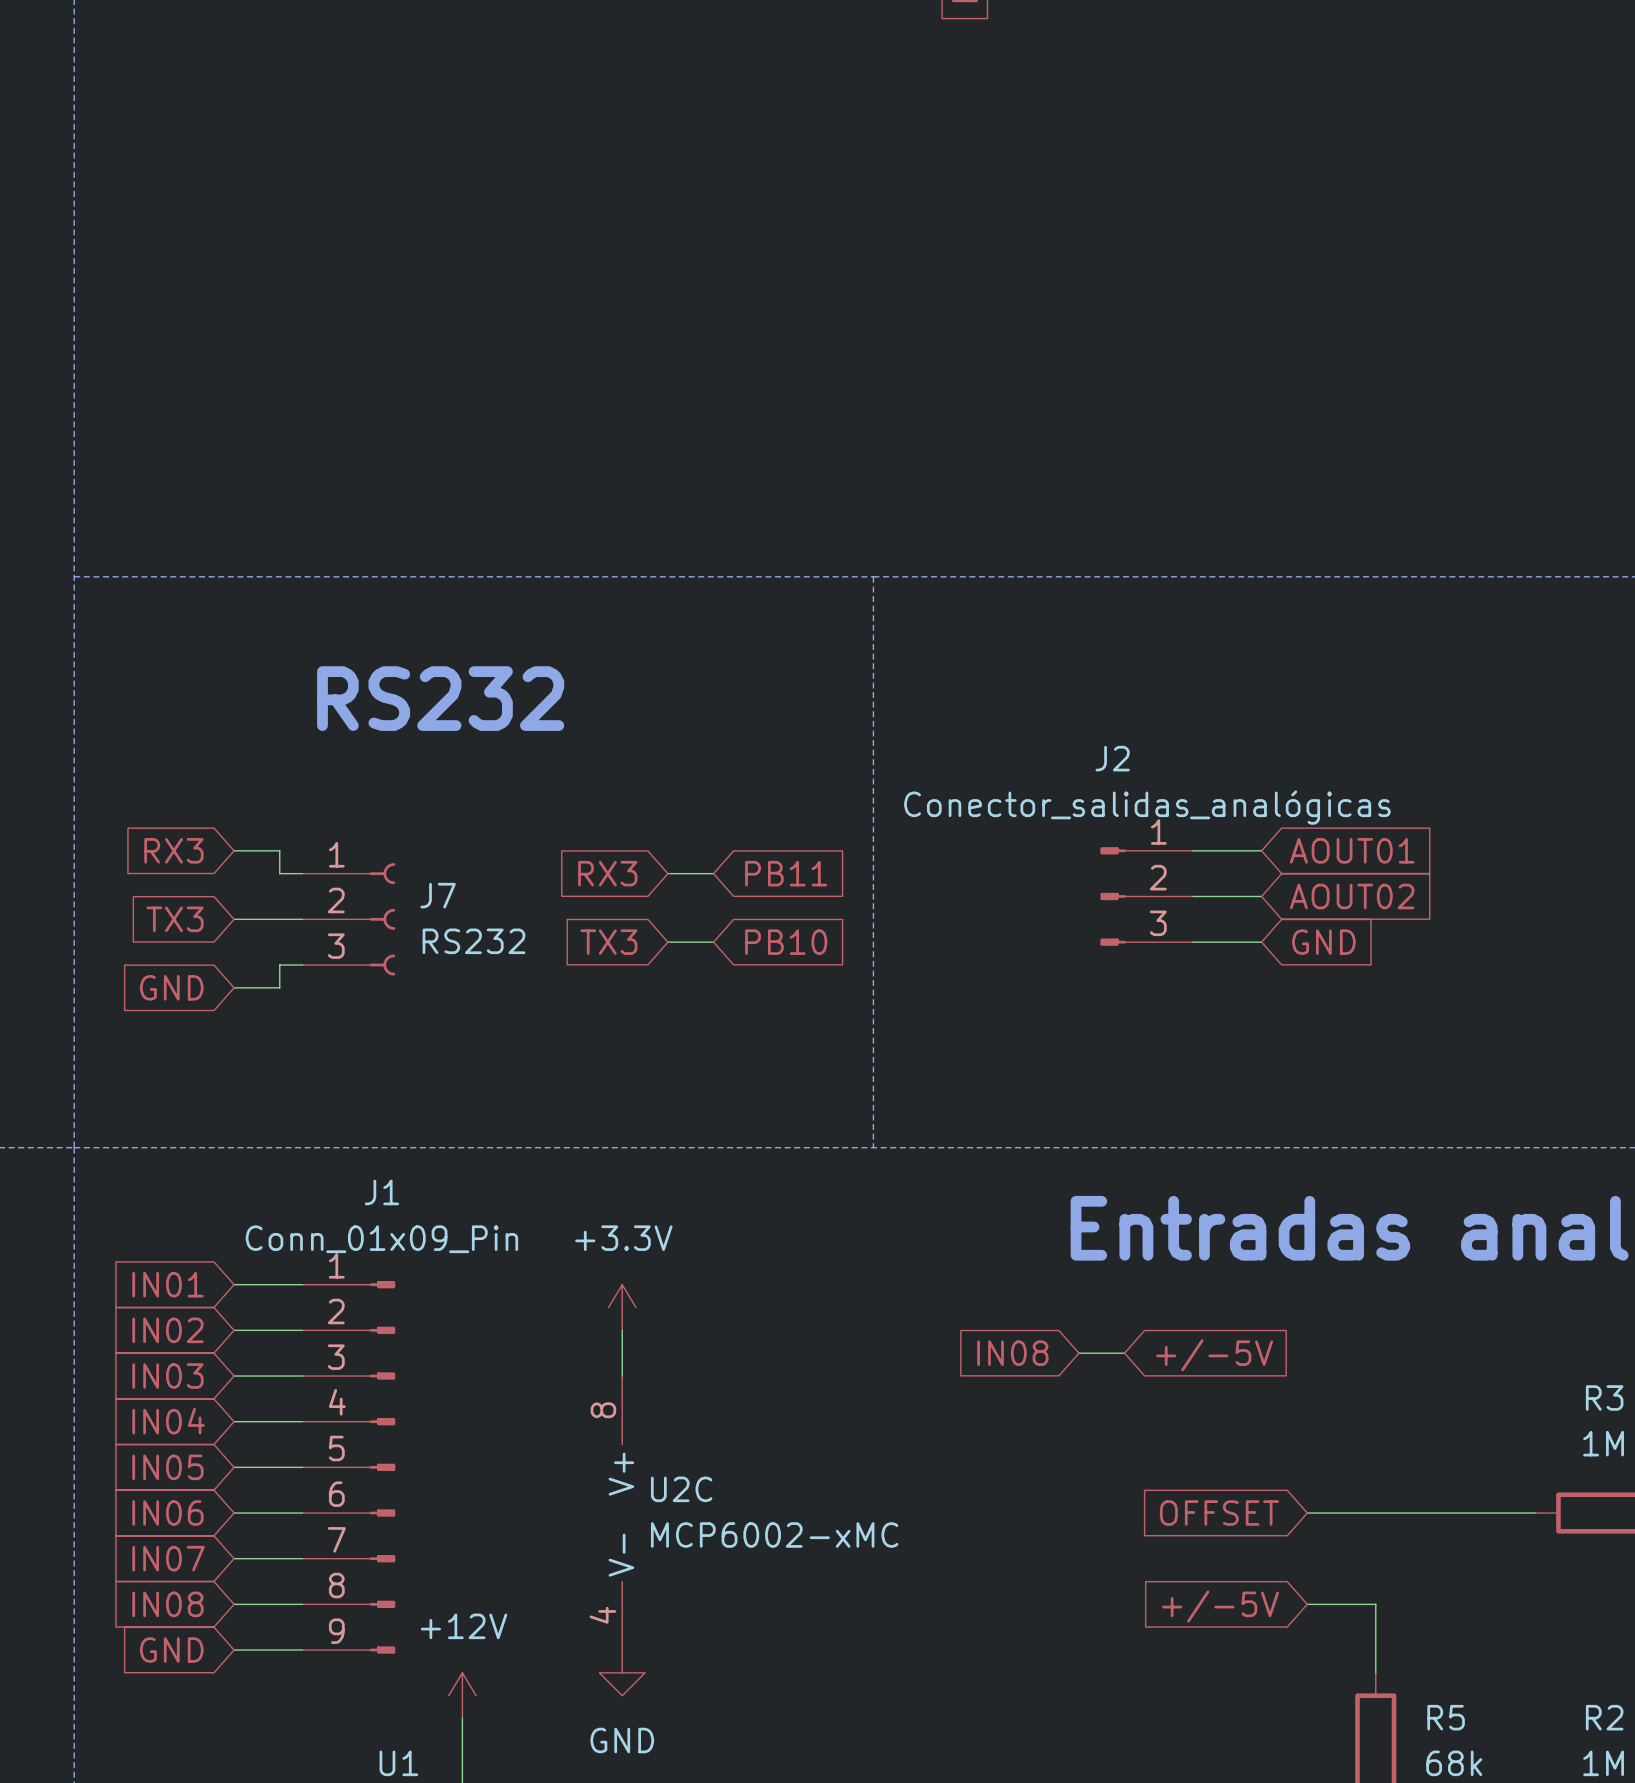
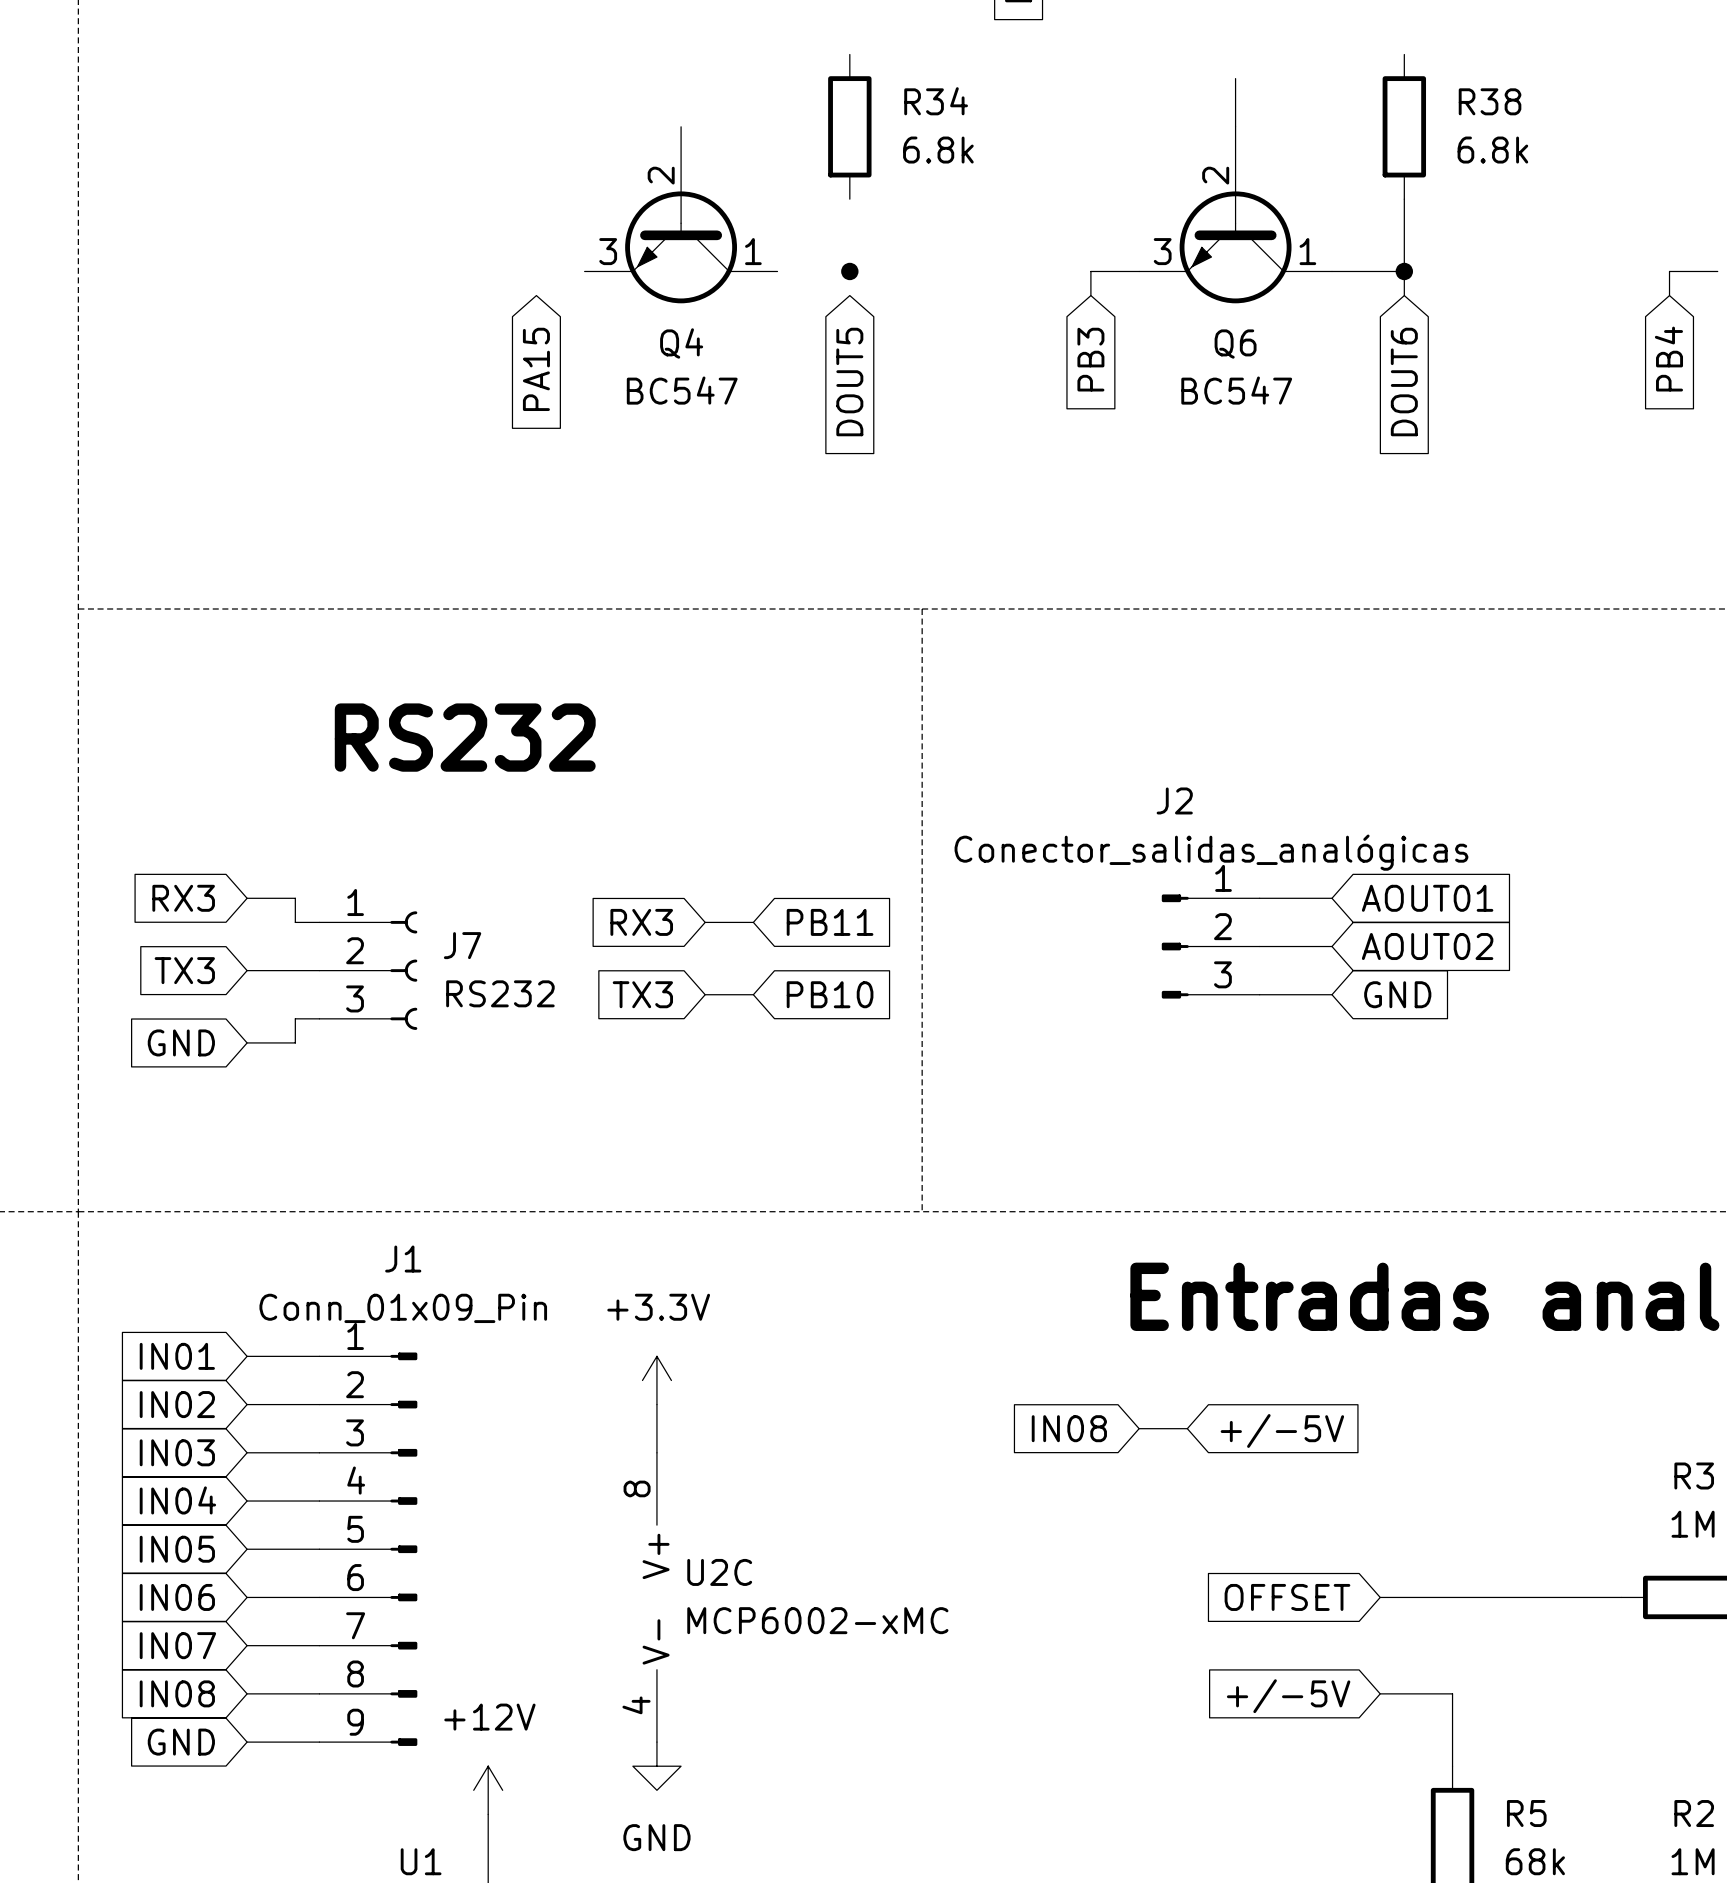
wire: none -> (1235, 78) (1235, 126)
R34: none -> 6.8k (849, 126)
R38: none -> 6.8k (1404, 126)
wire: none -> (1404, 199) (1404, 295)
Q4: none -> BC547 (681, 215)
Q6: none -> BC547 (1235, 215)
junction: none -> (849, 271)
wire: none -> (1139, 271) (1090, 271) (1090, 295)
wire: none -> (1332, 271) (1404, 271)
junction: none -> (1404, 271)
wire: none -> (1717, 271) (1669, 271) (1669, 295)
global label: none -> PB3 (1090, 359)
global label: none -> PB4 (1668, 359)
global label: none -> PA15 (536, 369)
global label: none -> DOUT5 (849, 382)
global label: none -> DOUT6 (1404, 382)

